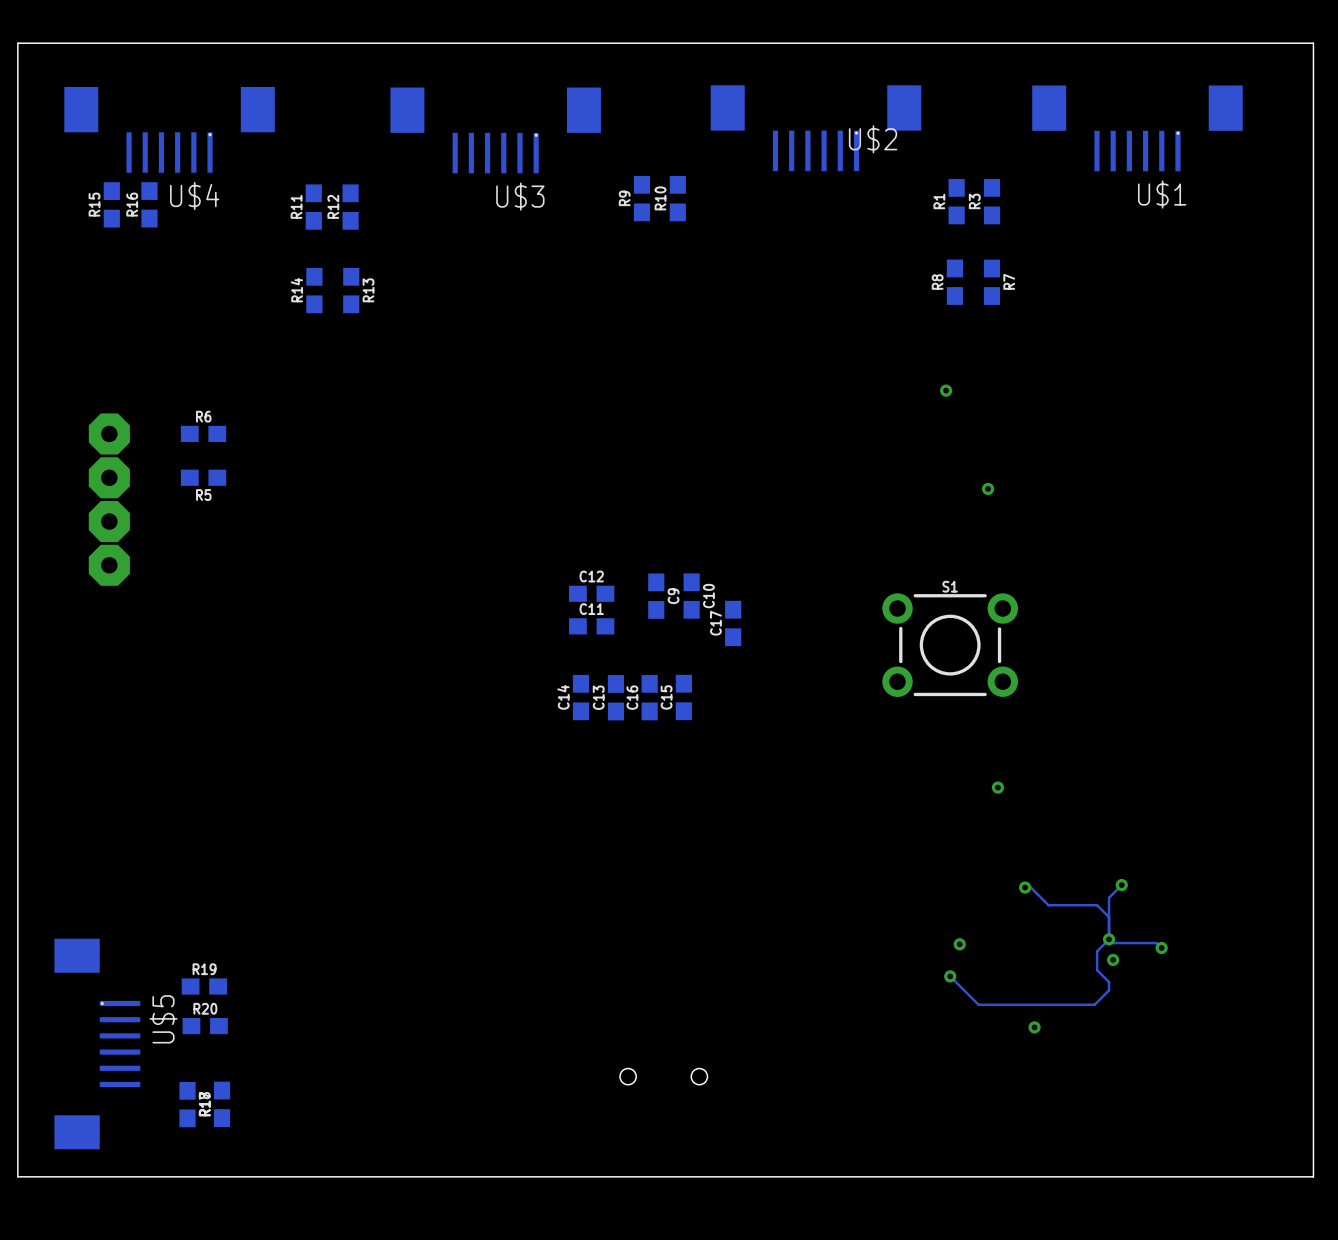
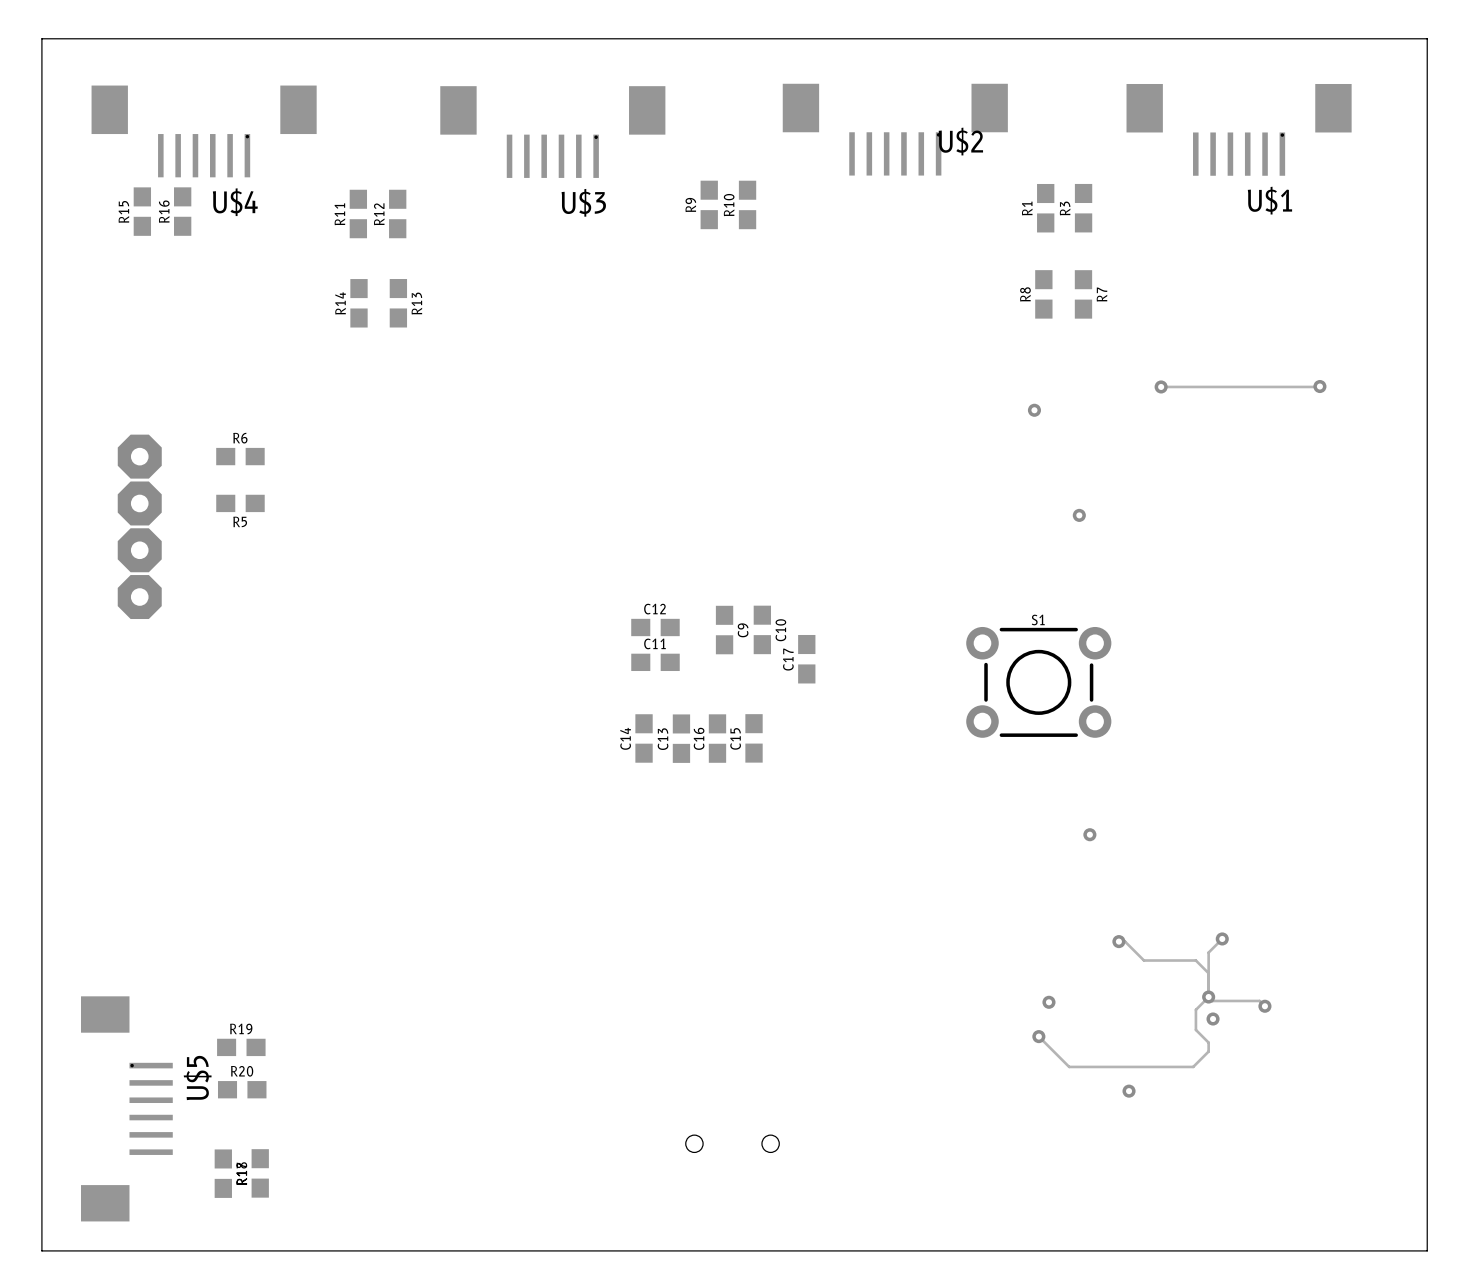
via: none -> (1161, 386)
track: none -> (1319, 386) (1161, 386)
via: none -> (1319, 386)

